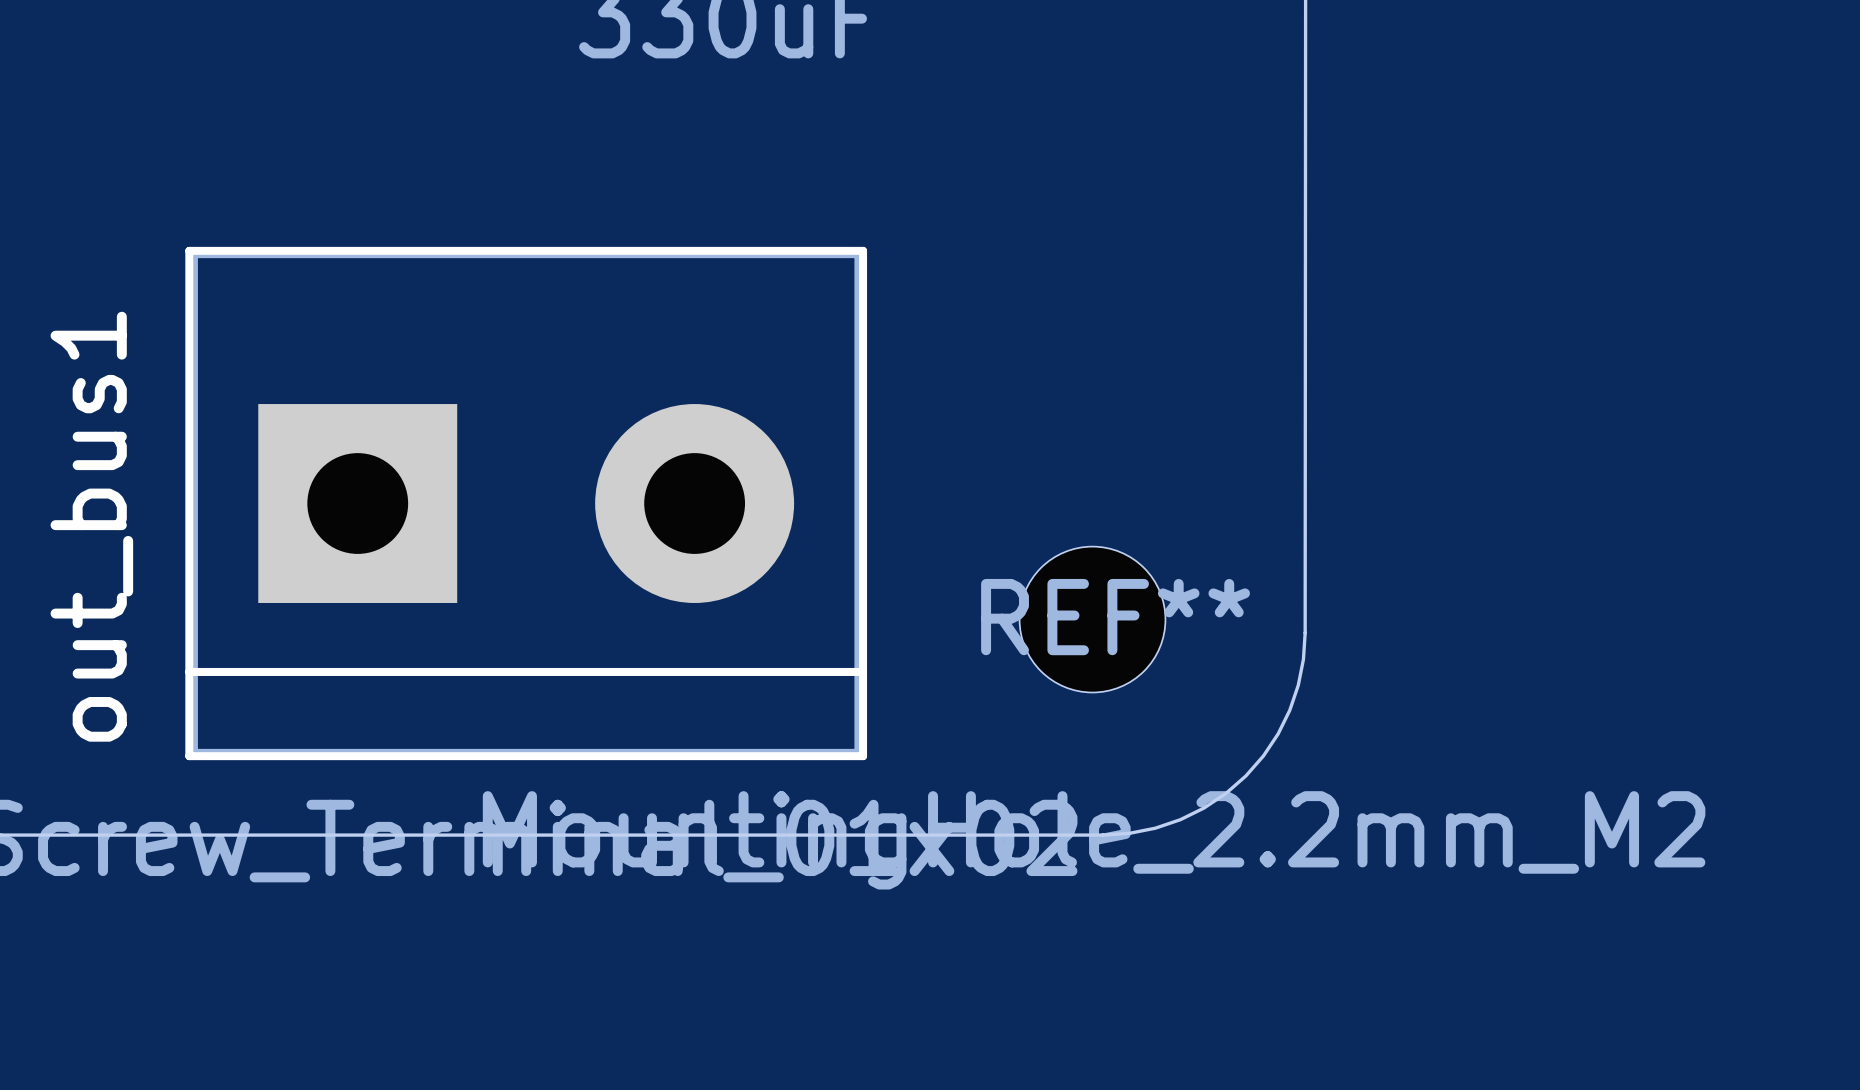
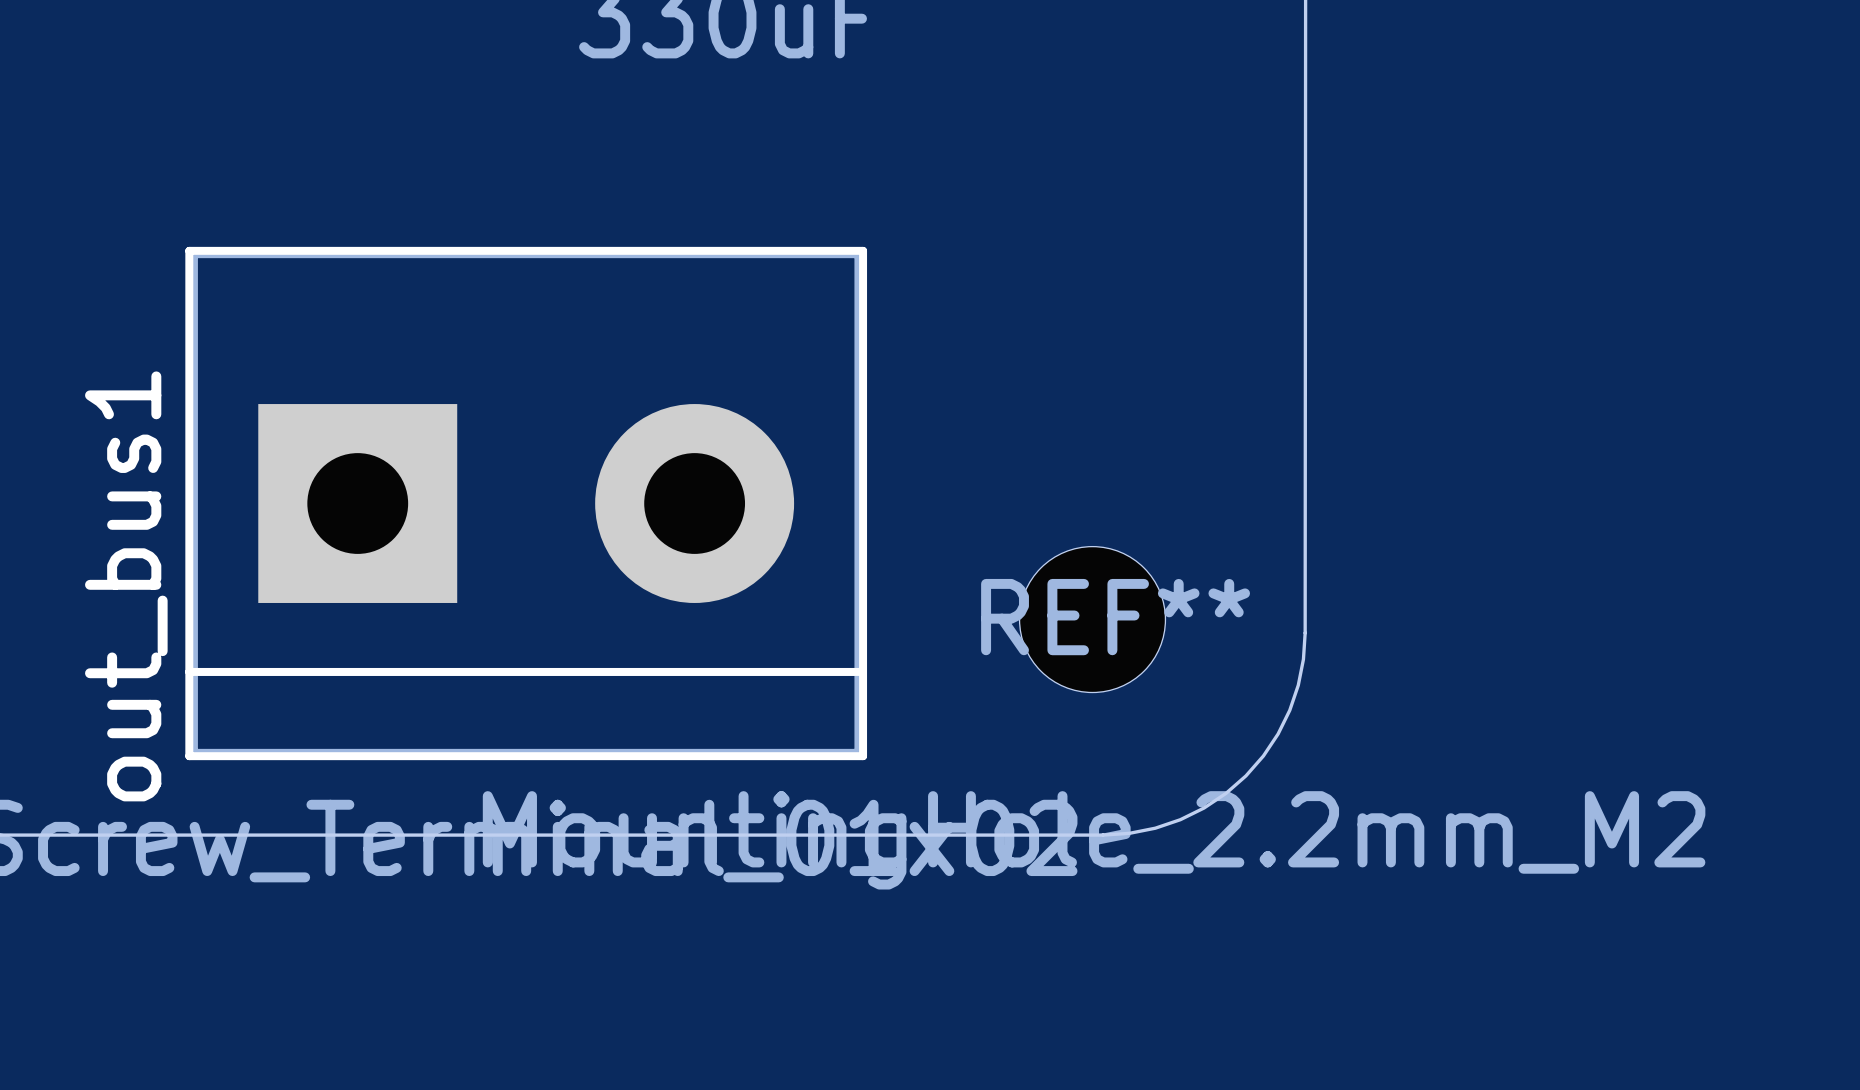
out_bus1 name position: out_bus1 (91, 526) -> out_bus1 (126, 586)

